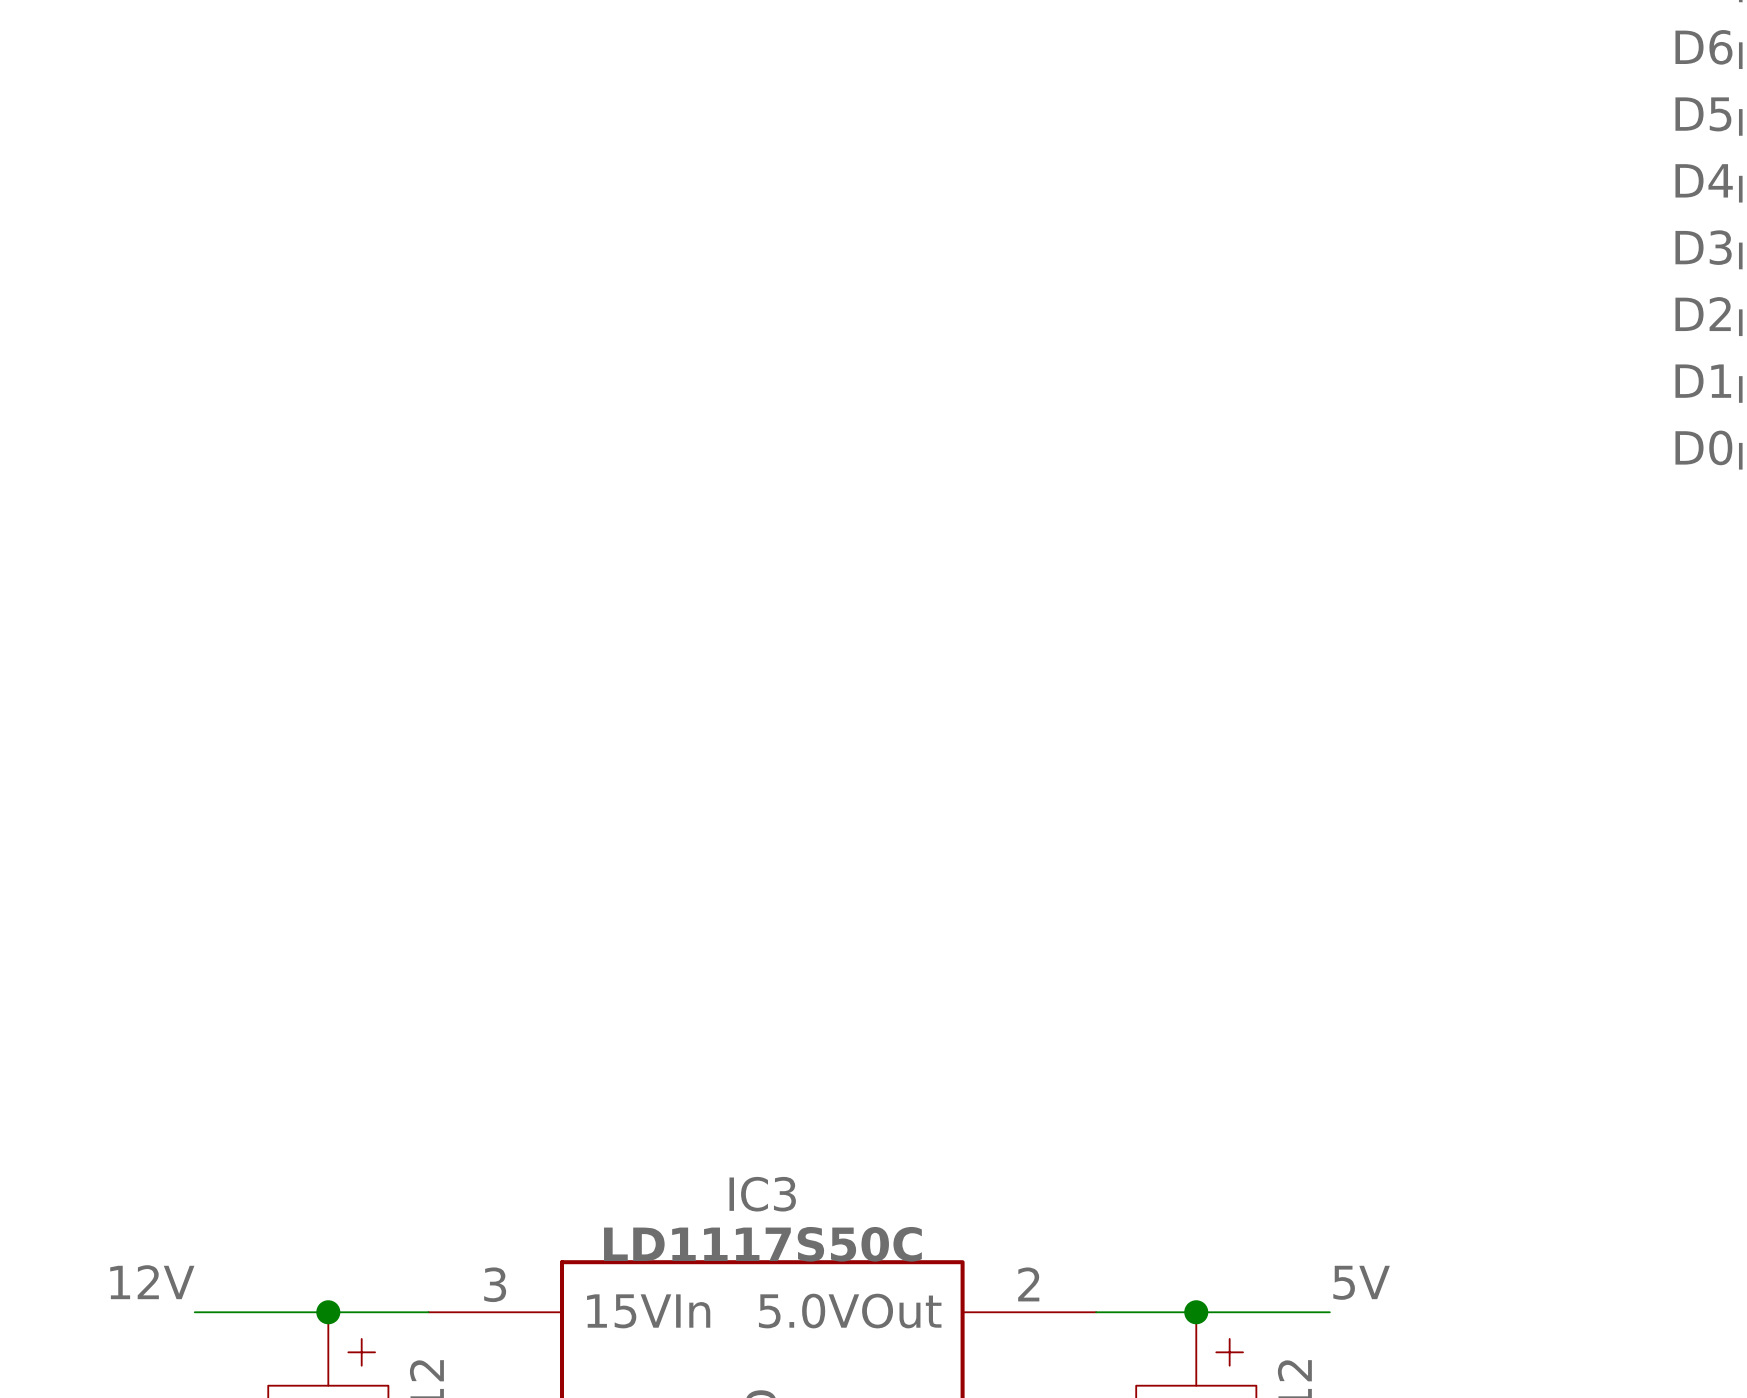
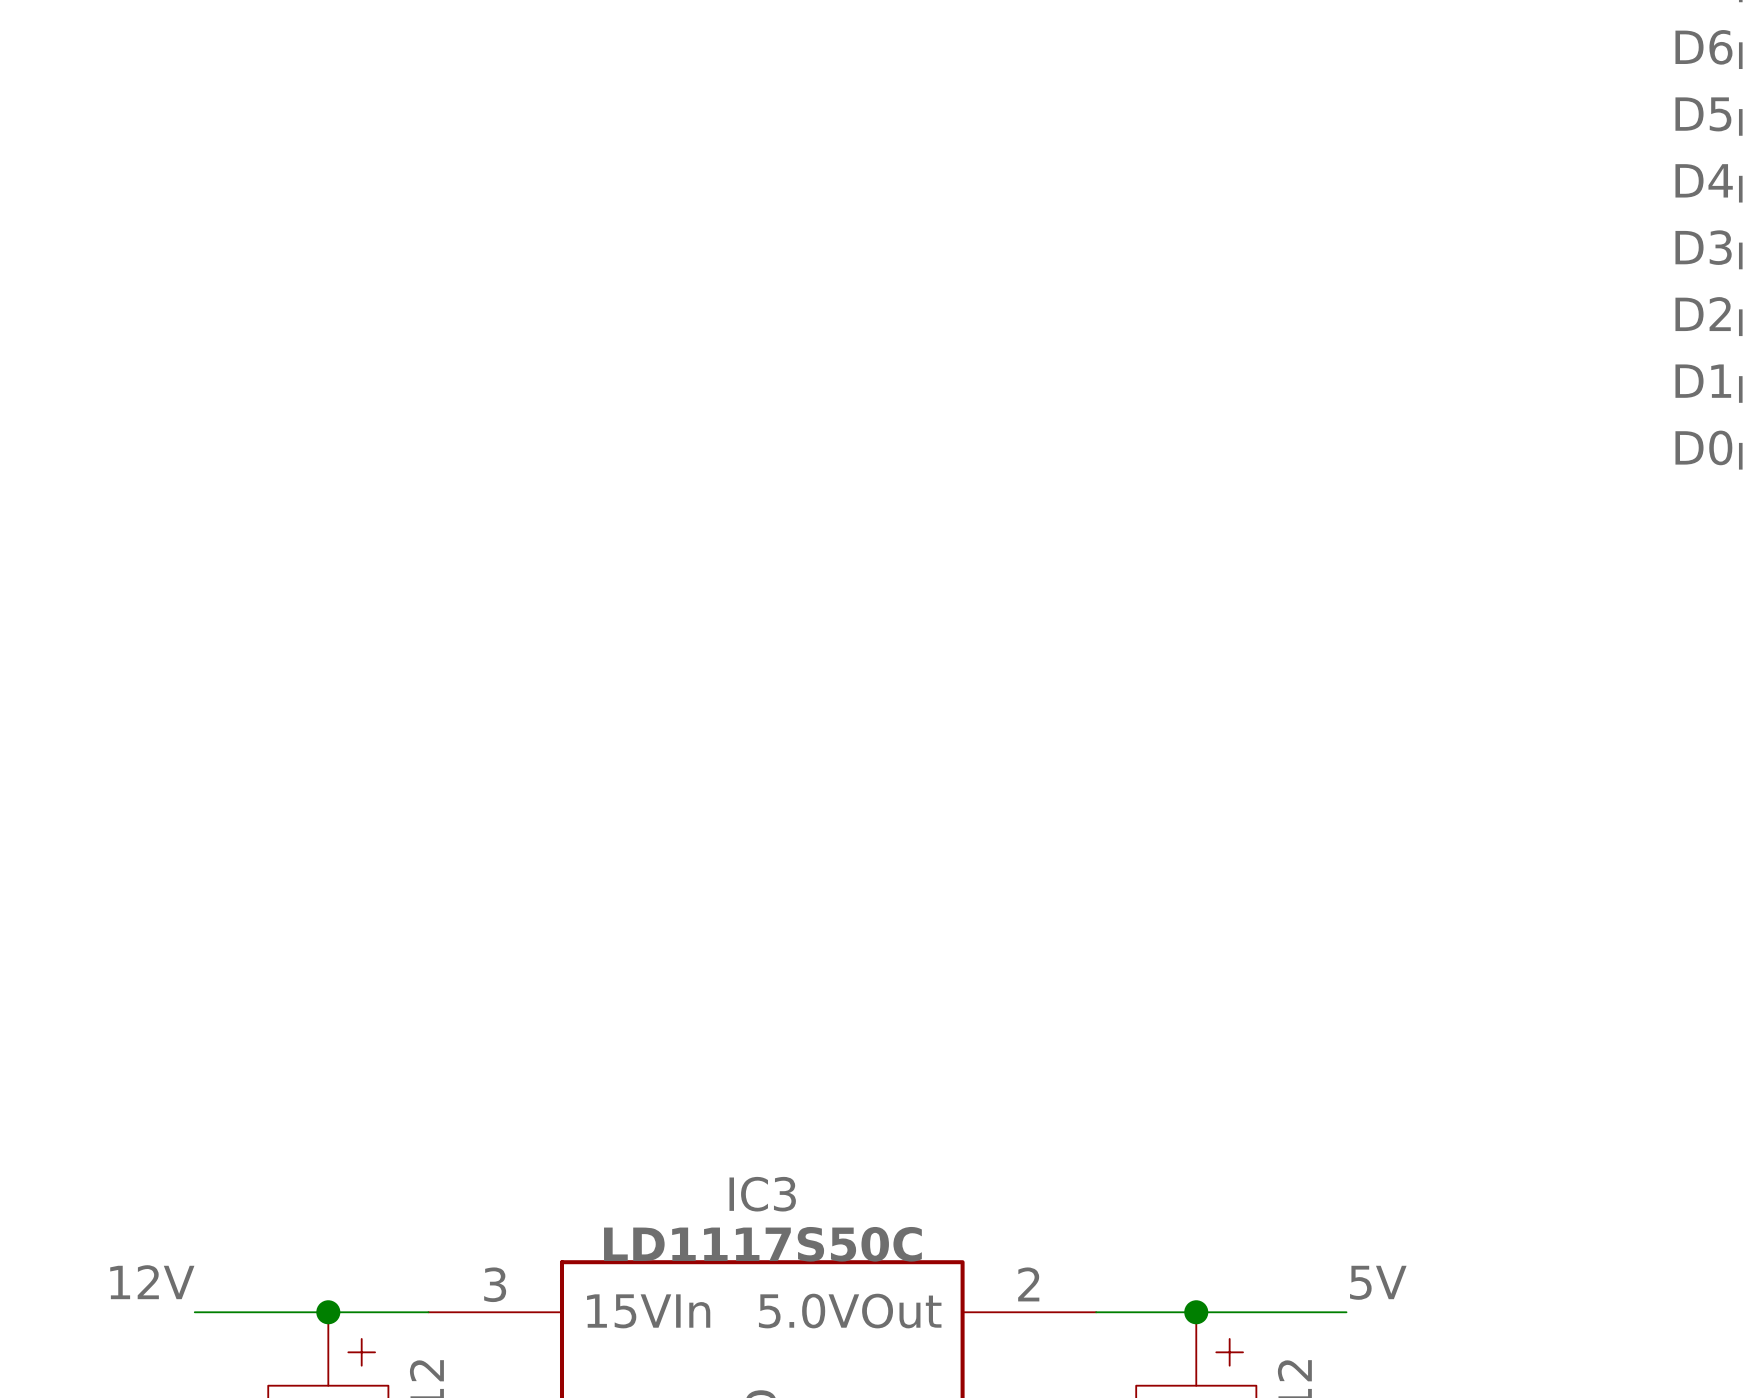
label position: 5V (1361, 1282) -> 5V (1378, 1282)
wire: none -> (1329, 1312) (1346, 1312)

